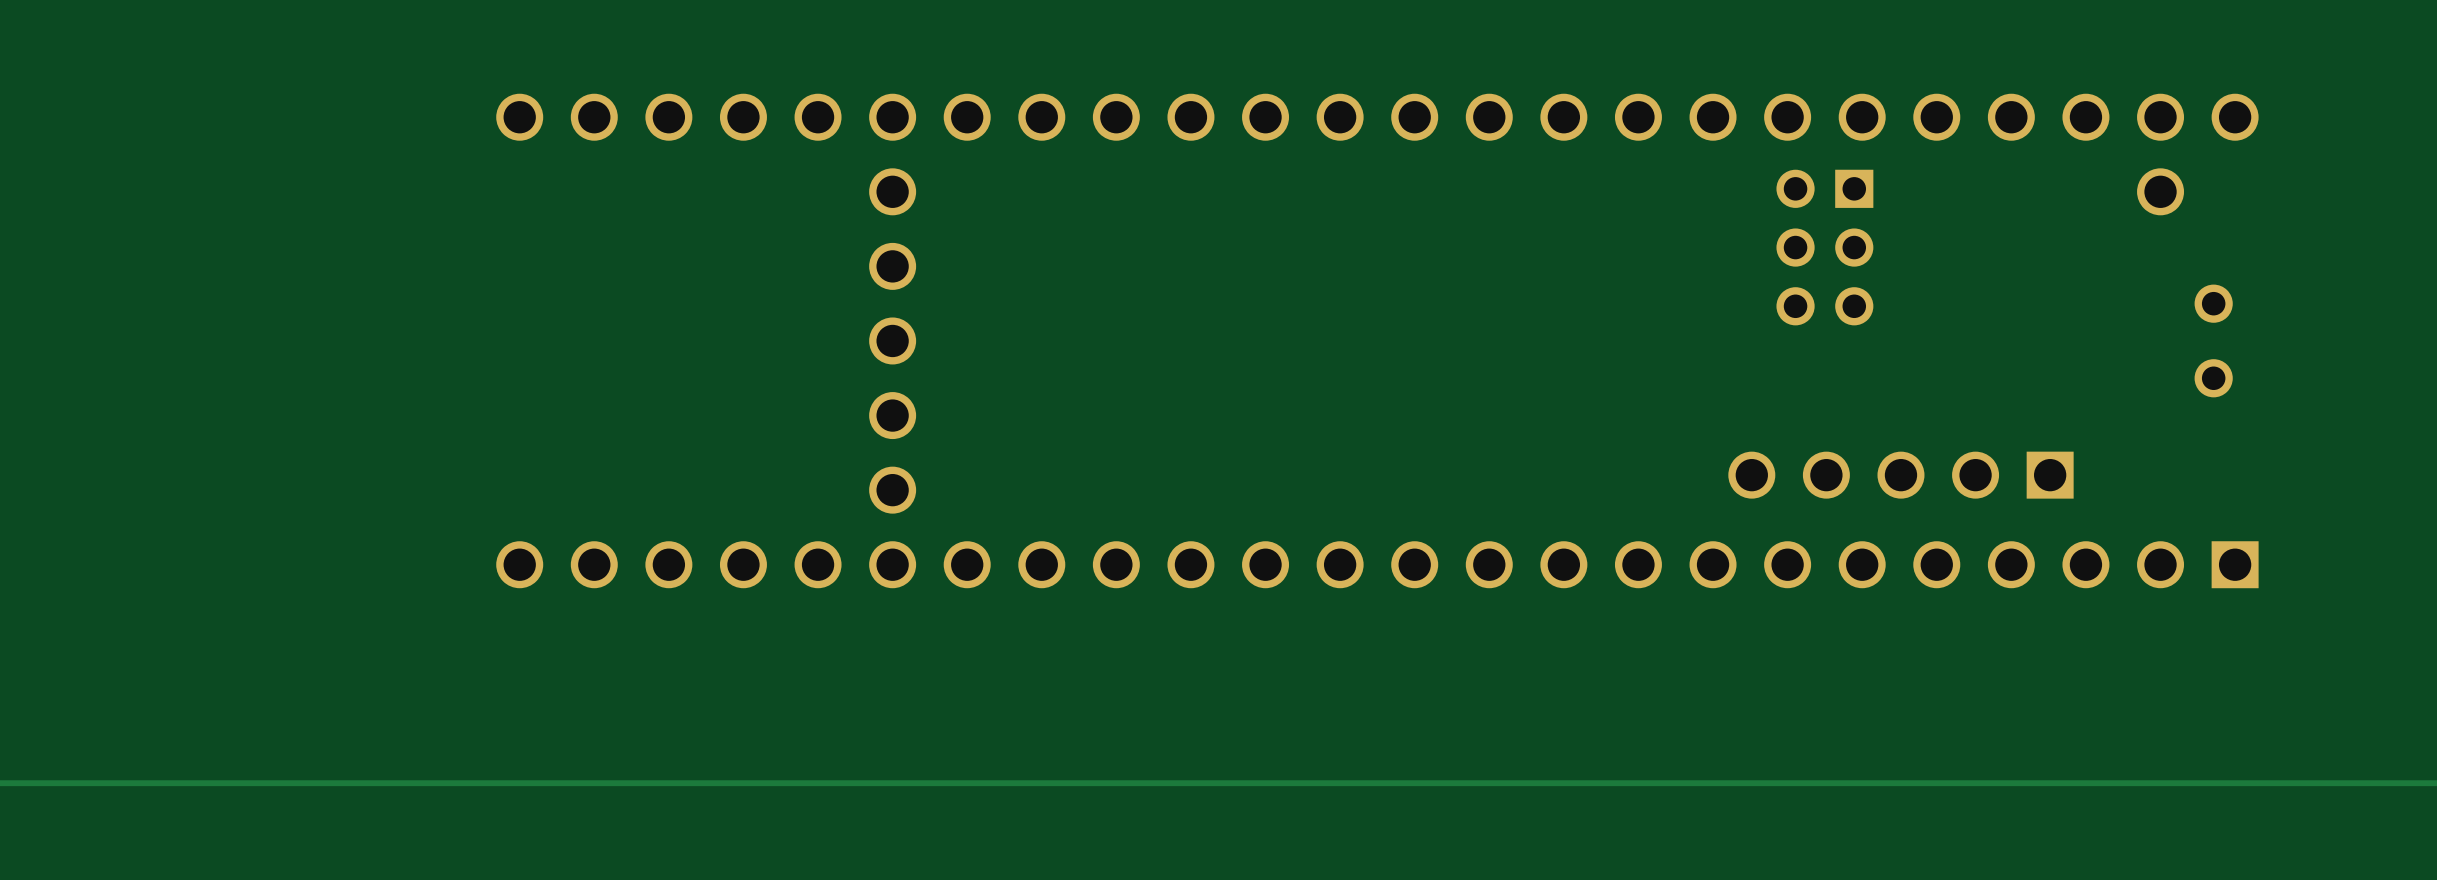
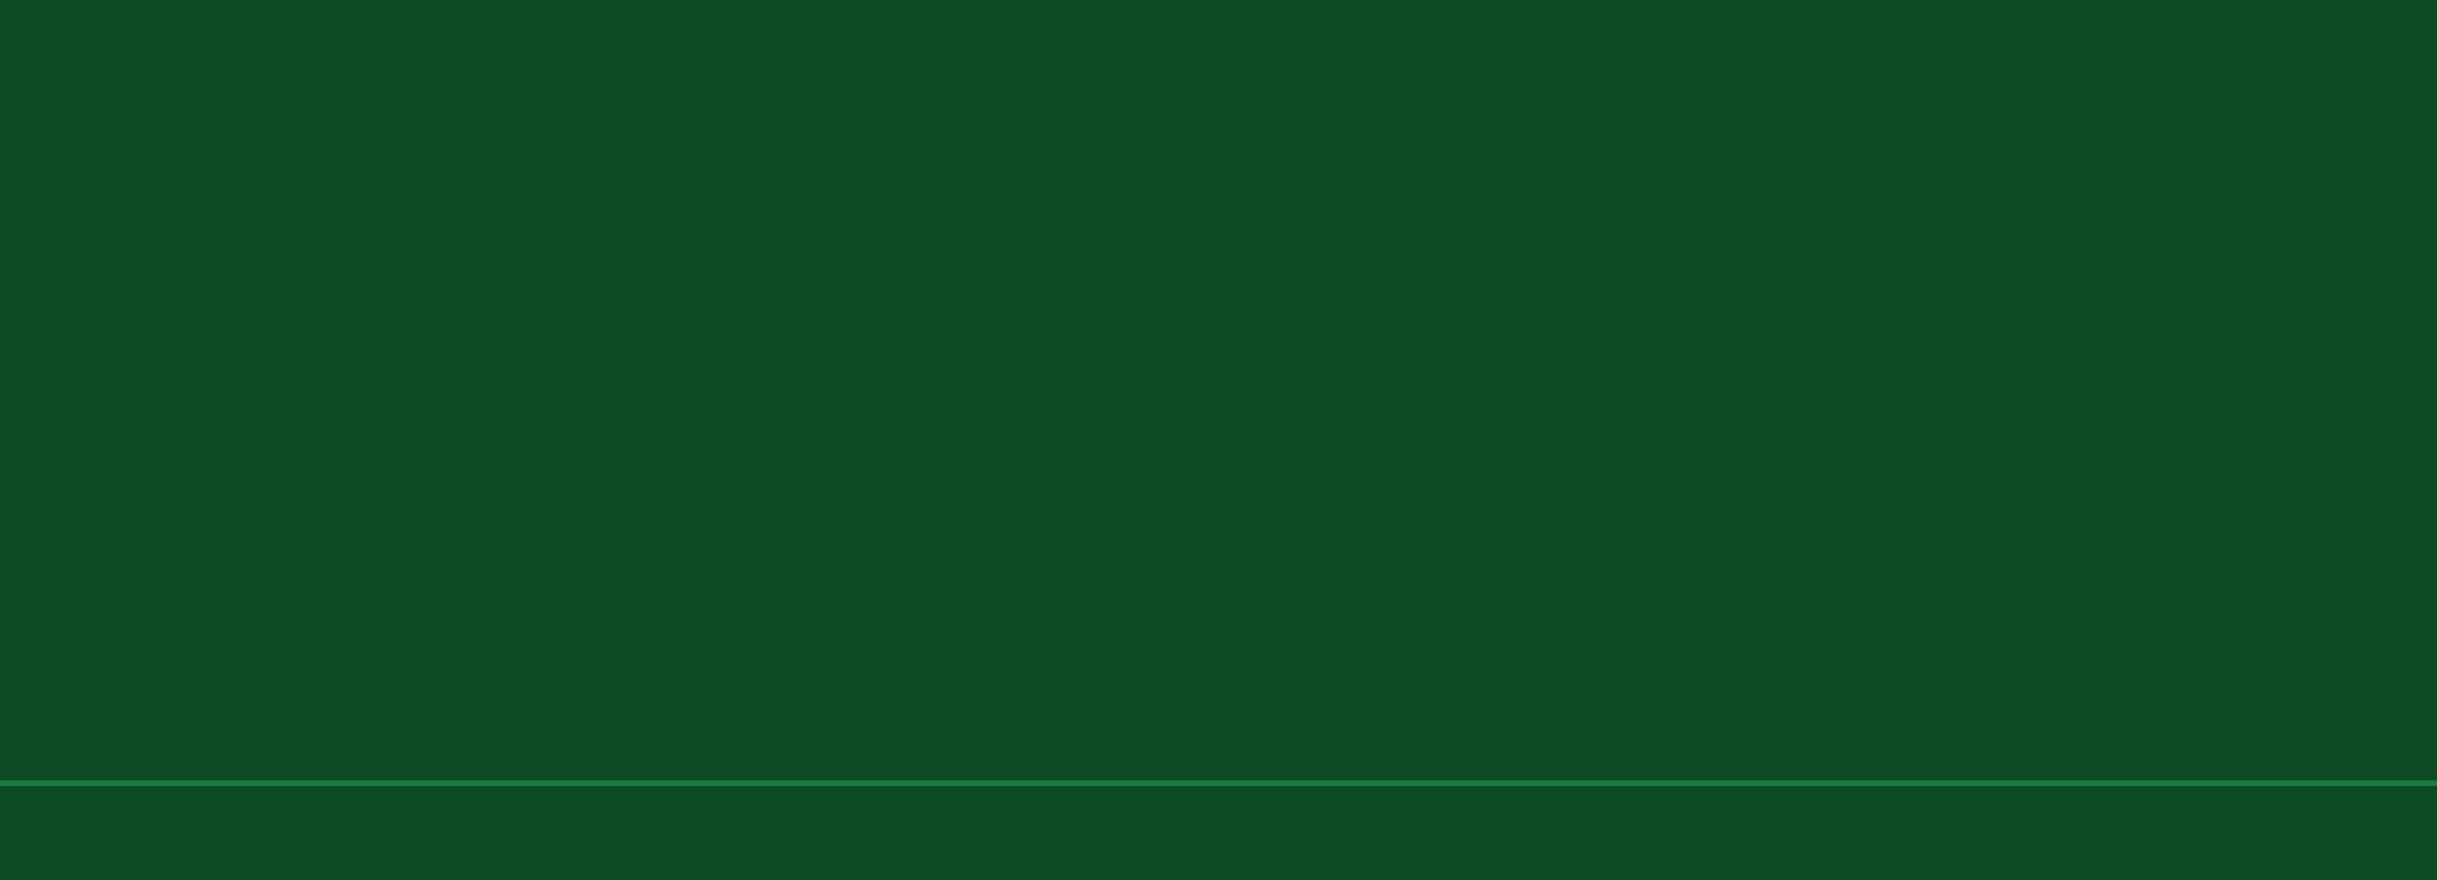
part: (1377, 340) -> none

